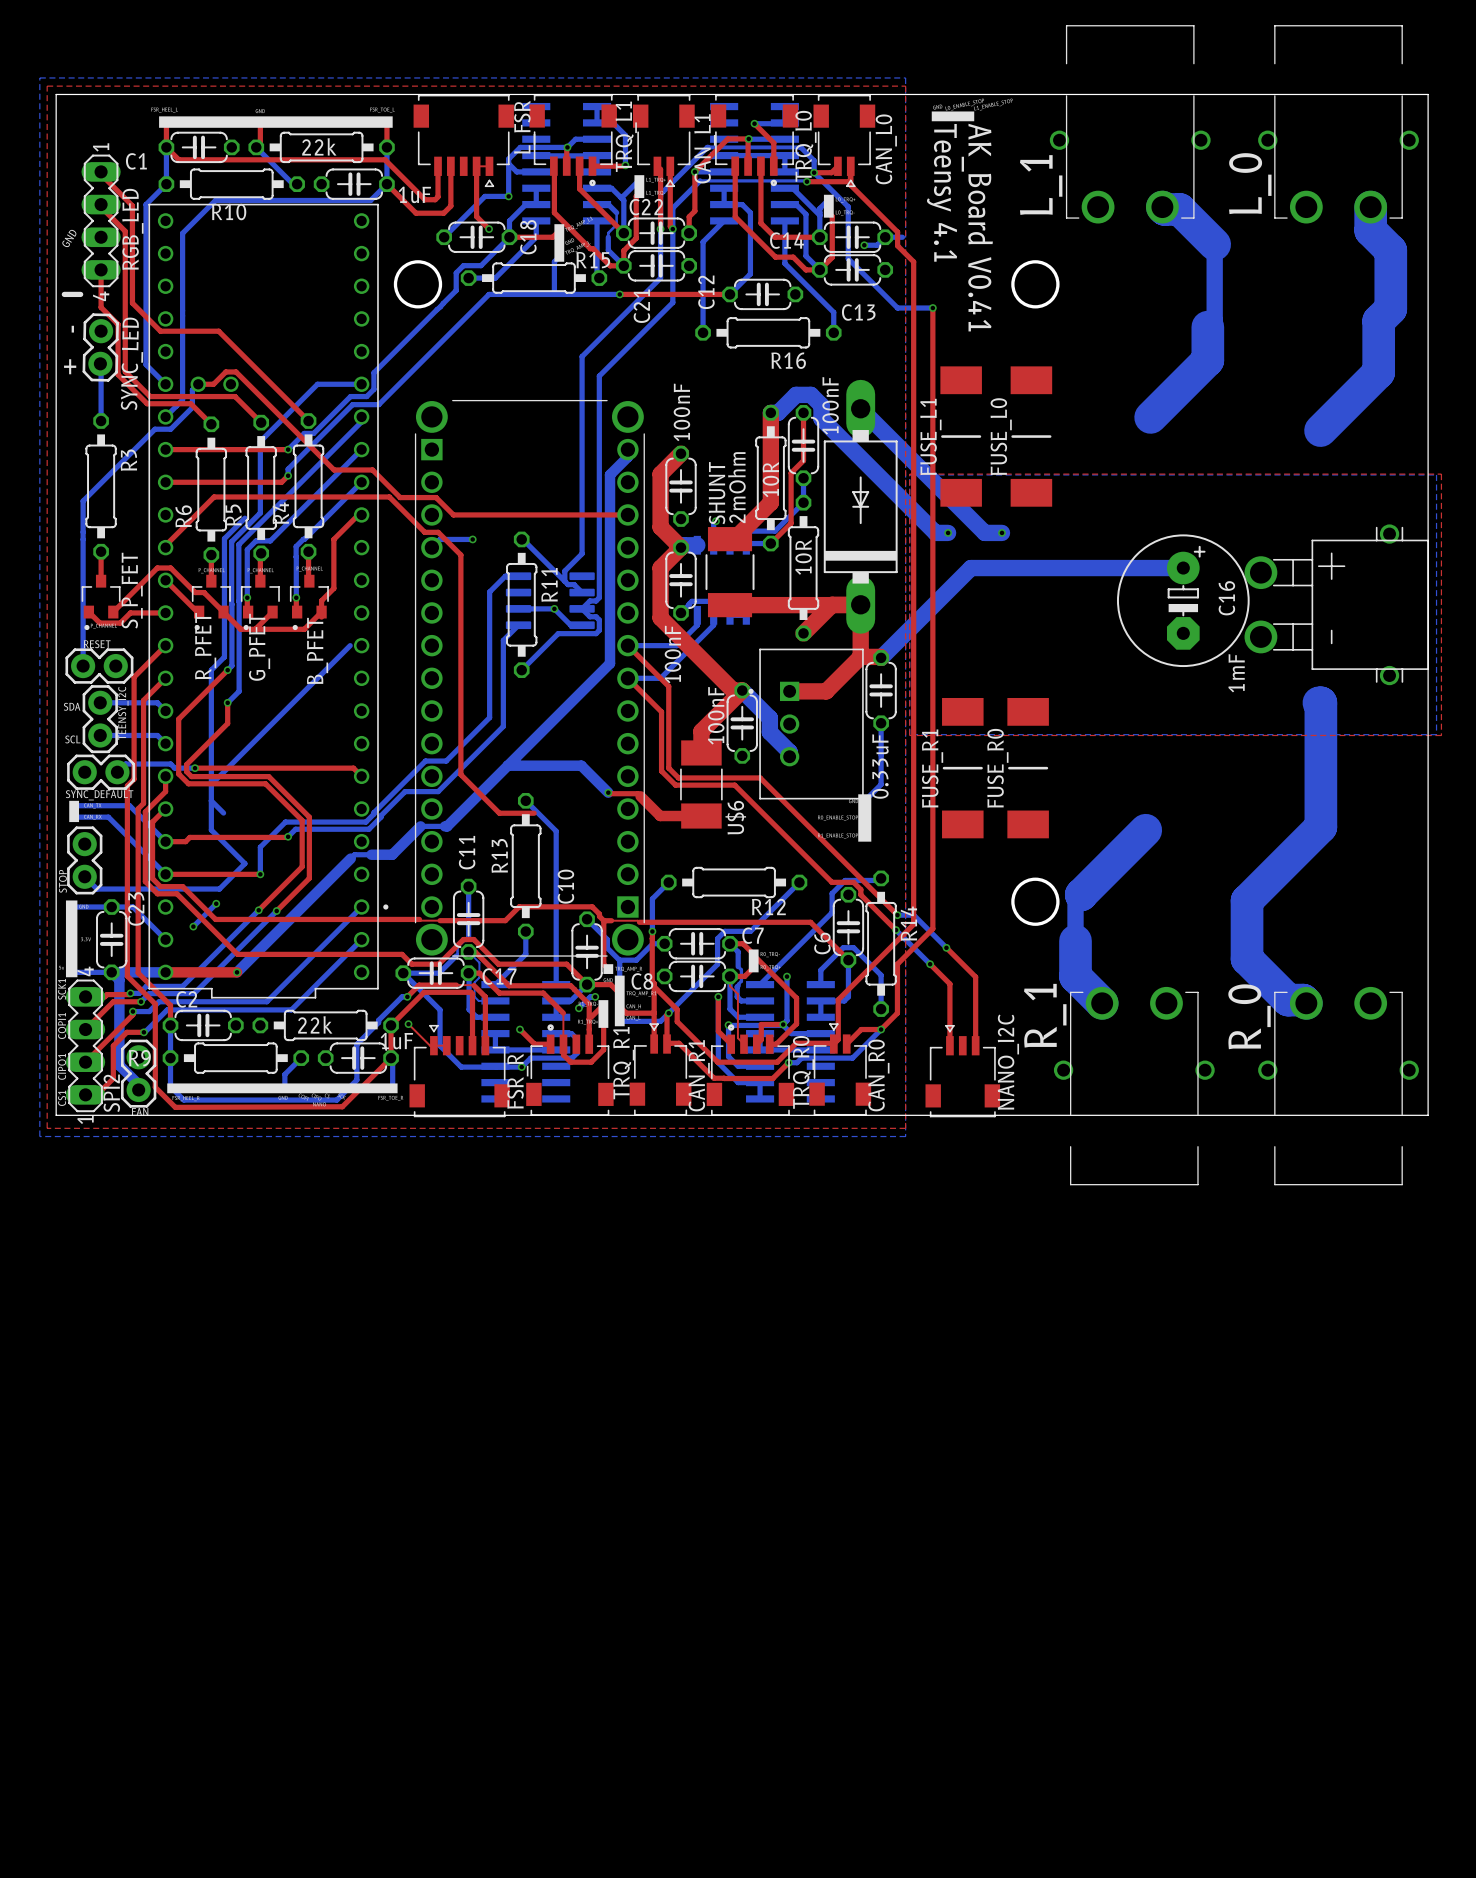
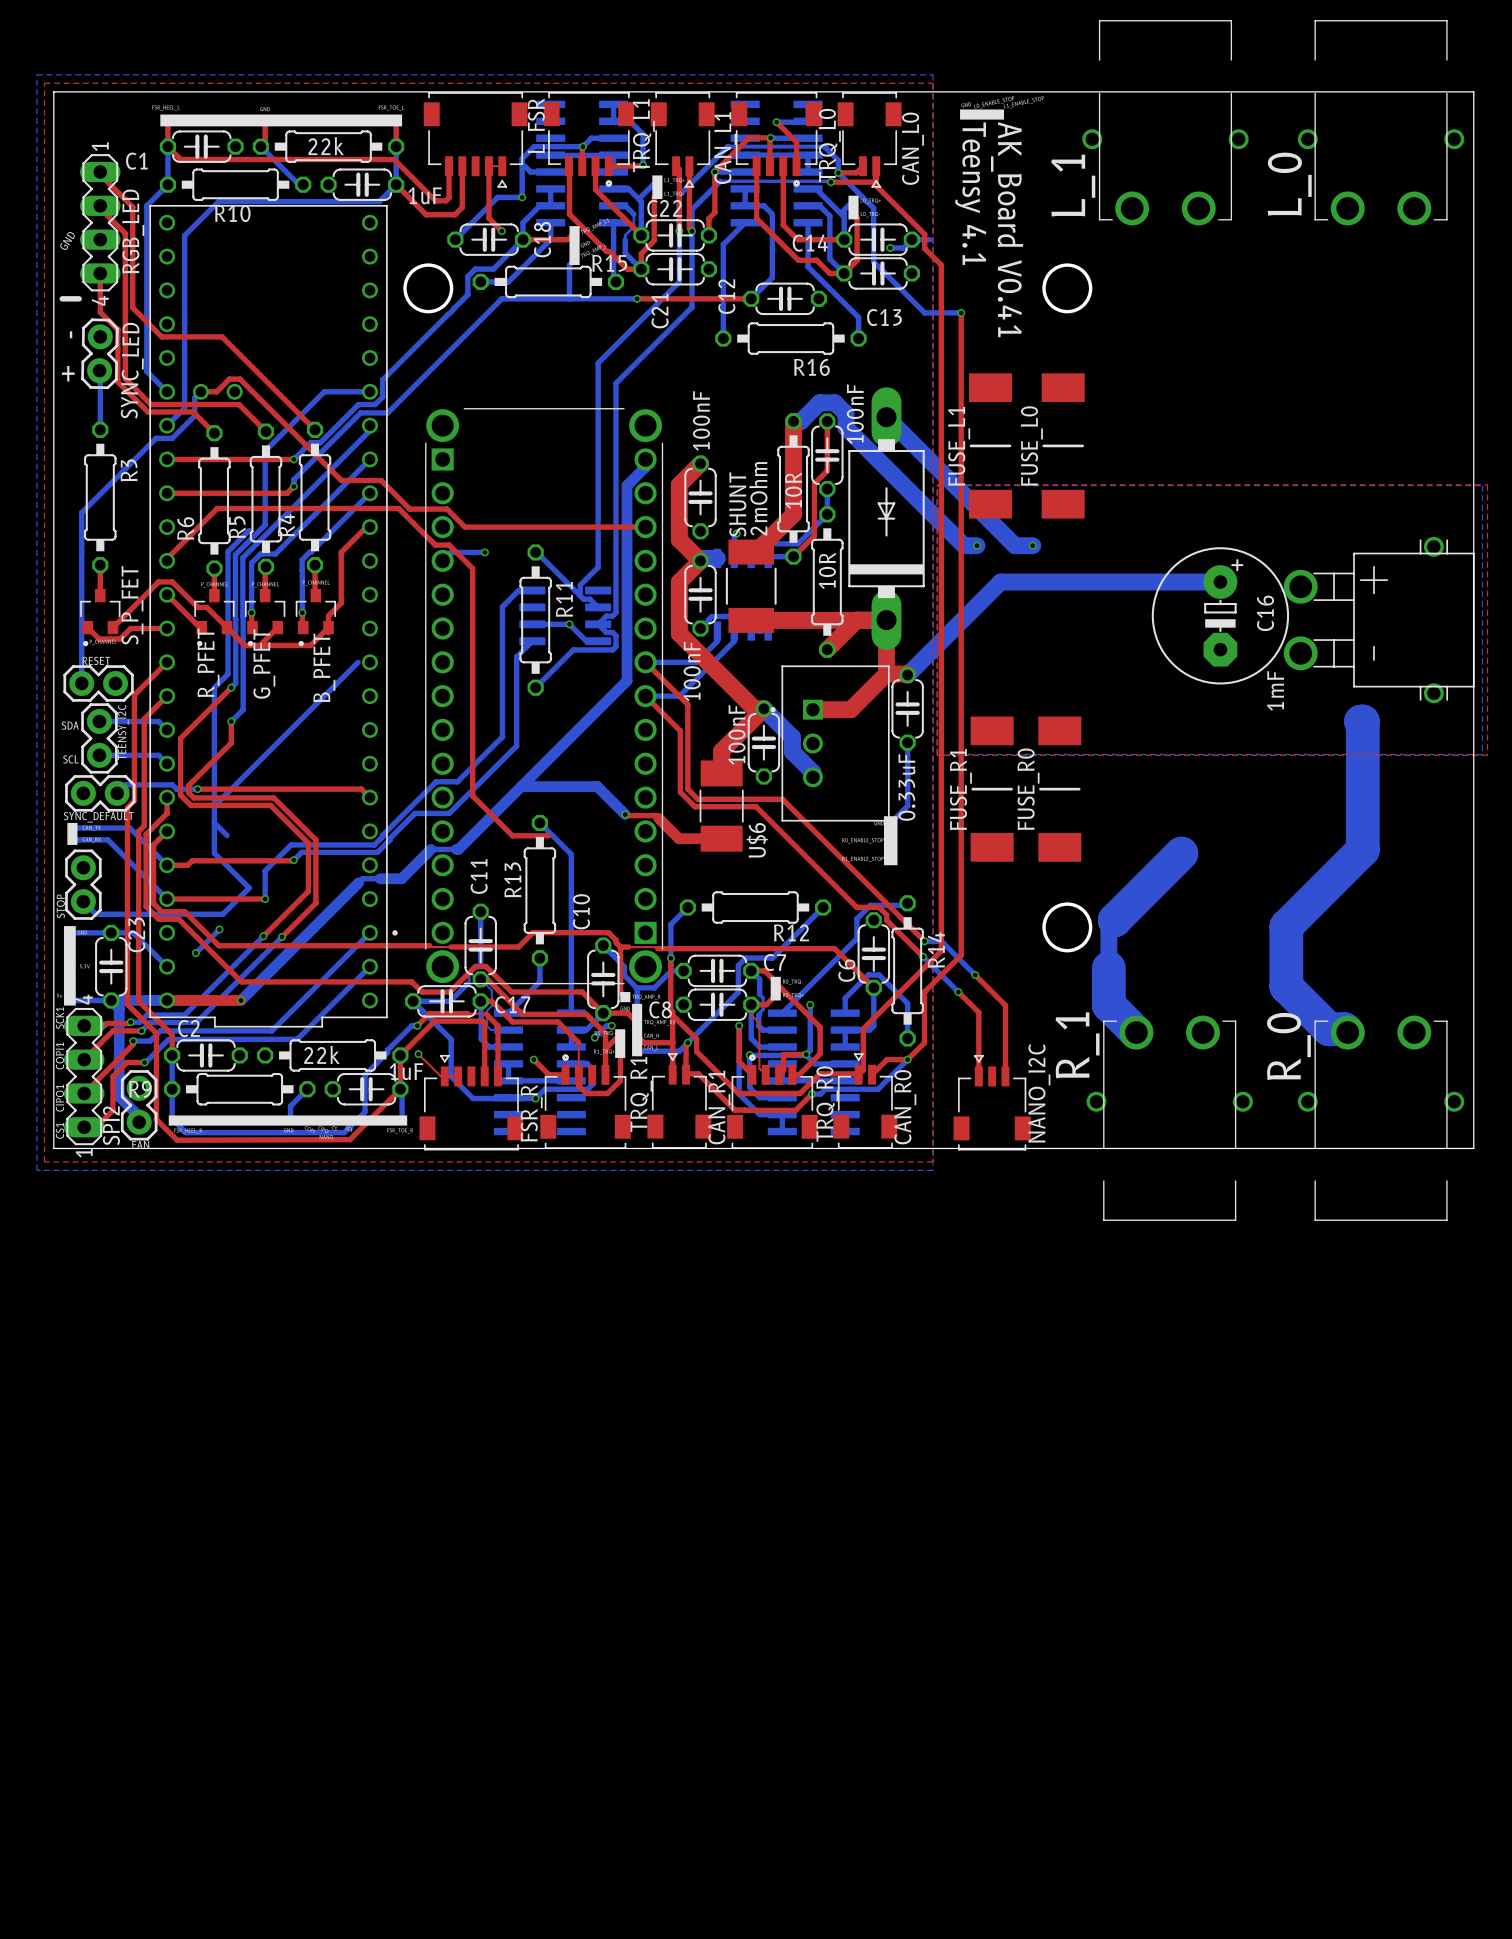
bottom track: (1162, 207) (1164, 209) (1179, 209) (1214, 244) (1214, 320) (1207, 327) (1207, 360) (1150, 417) -> none
bottom track: (1370, 207) (1370, 230) (1390, 250) (1390, 308) (1378, 320) (1378, 372) (1320, 430) -> none

